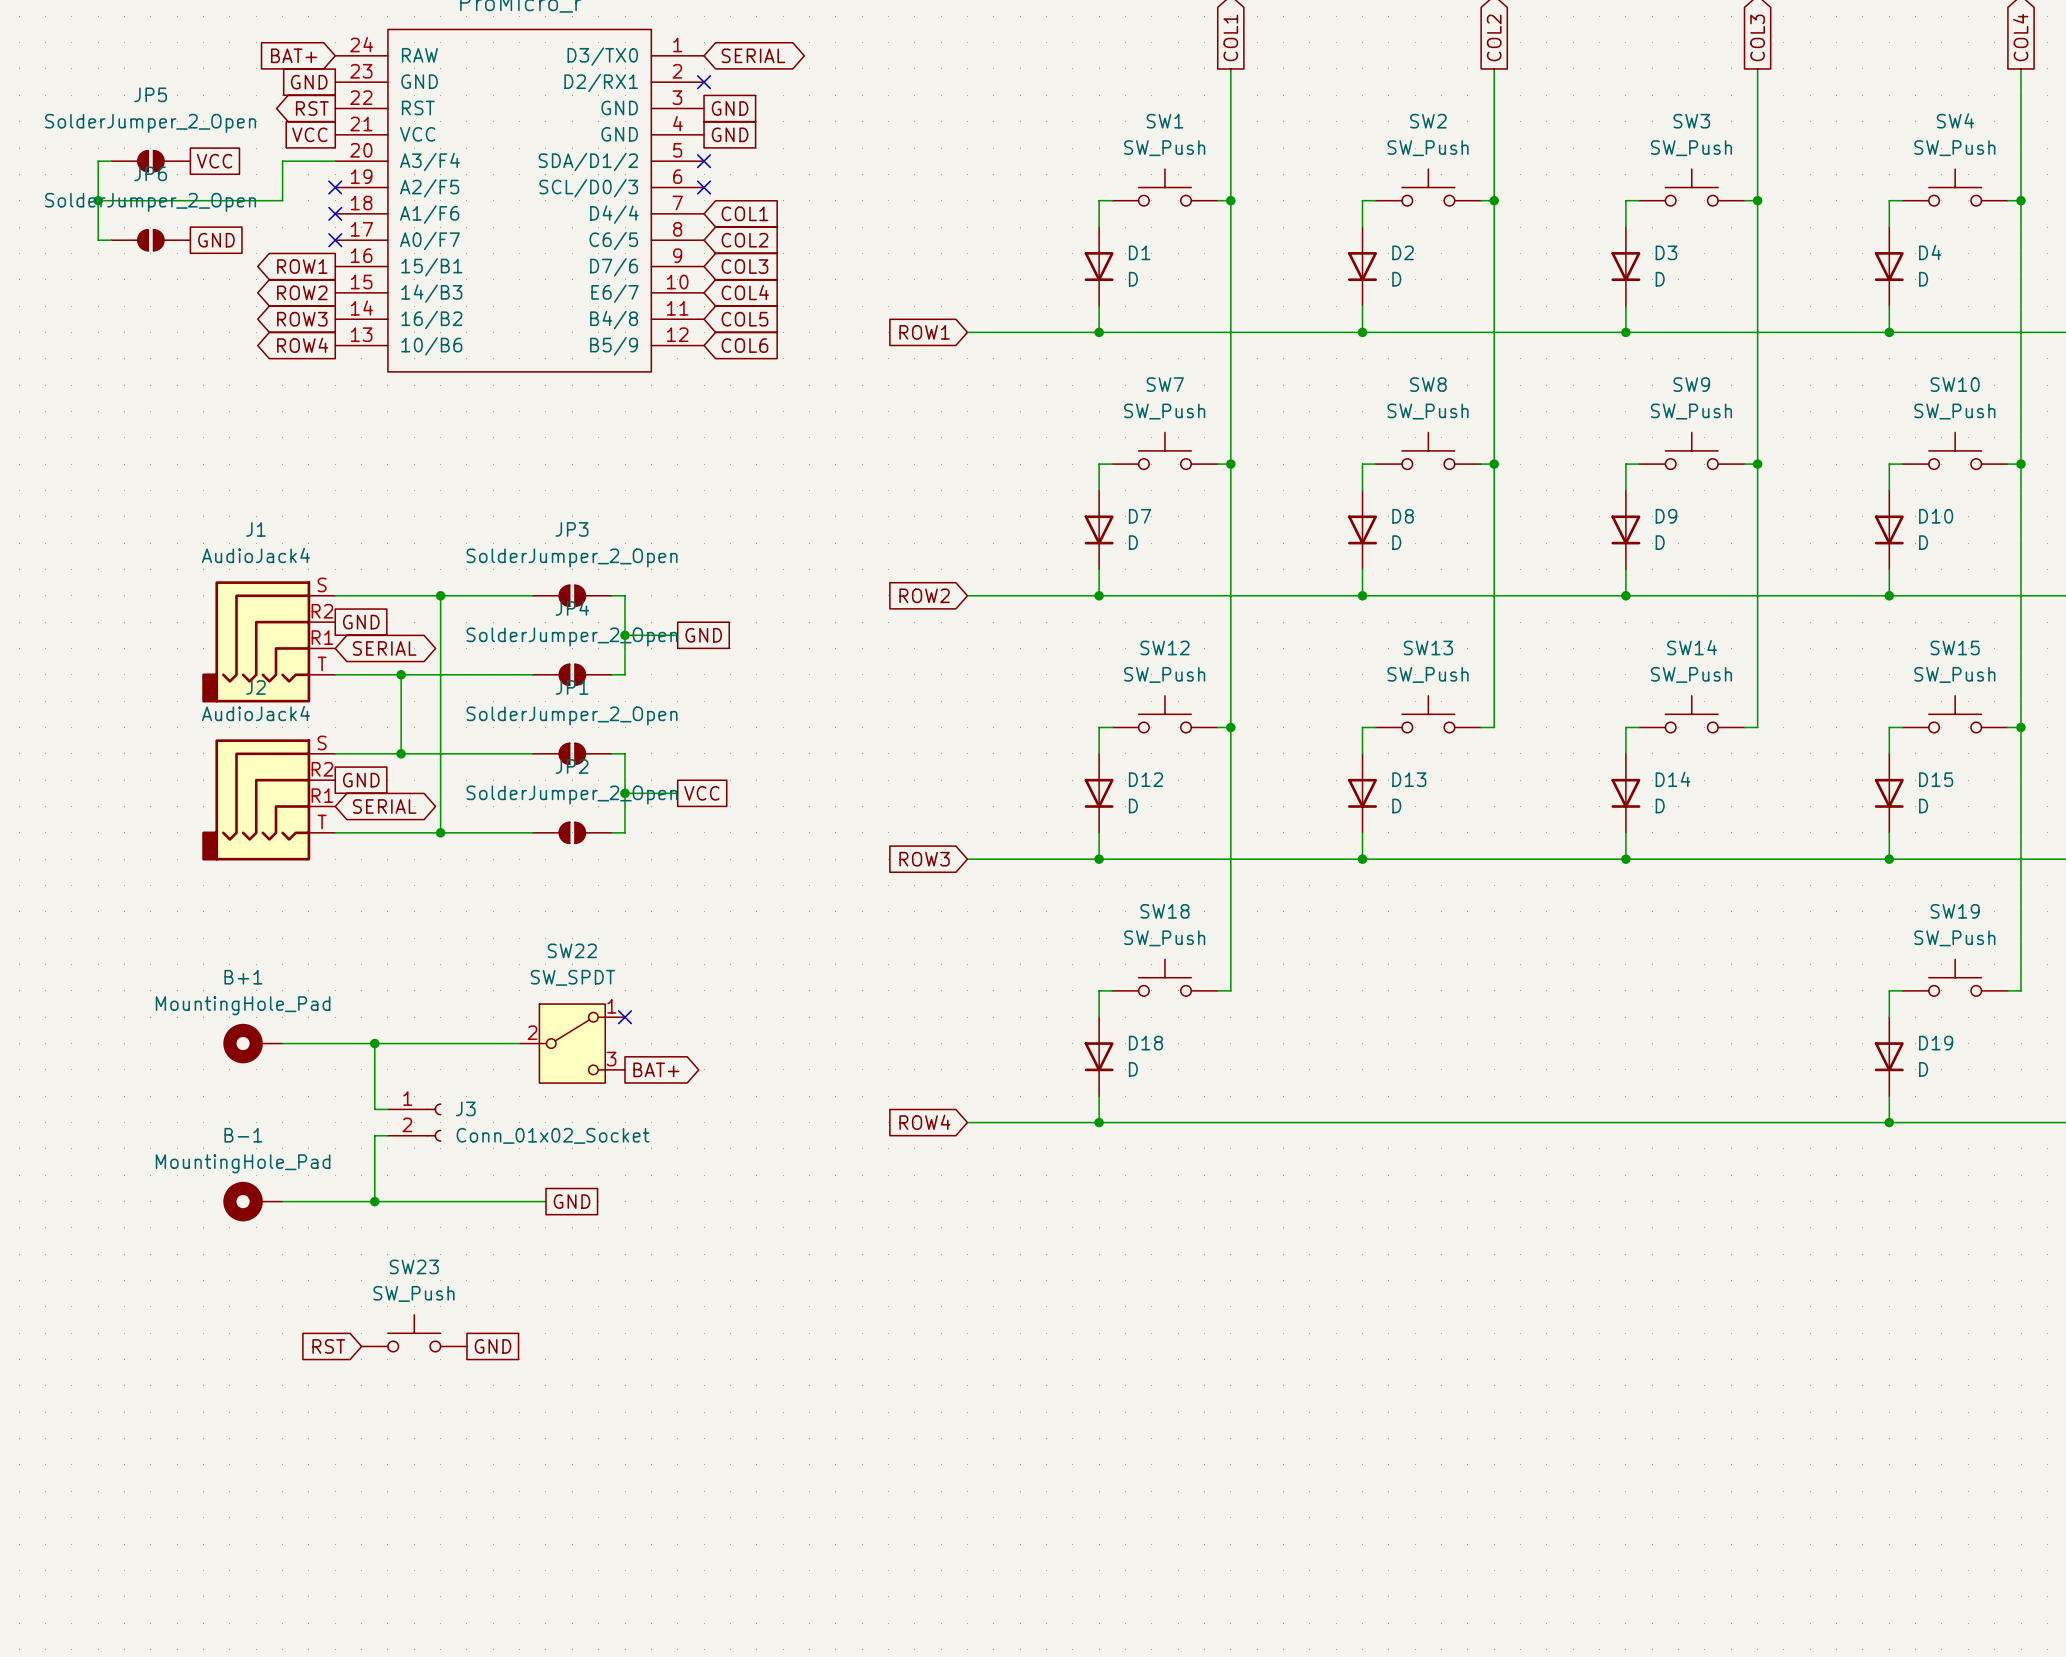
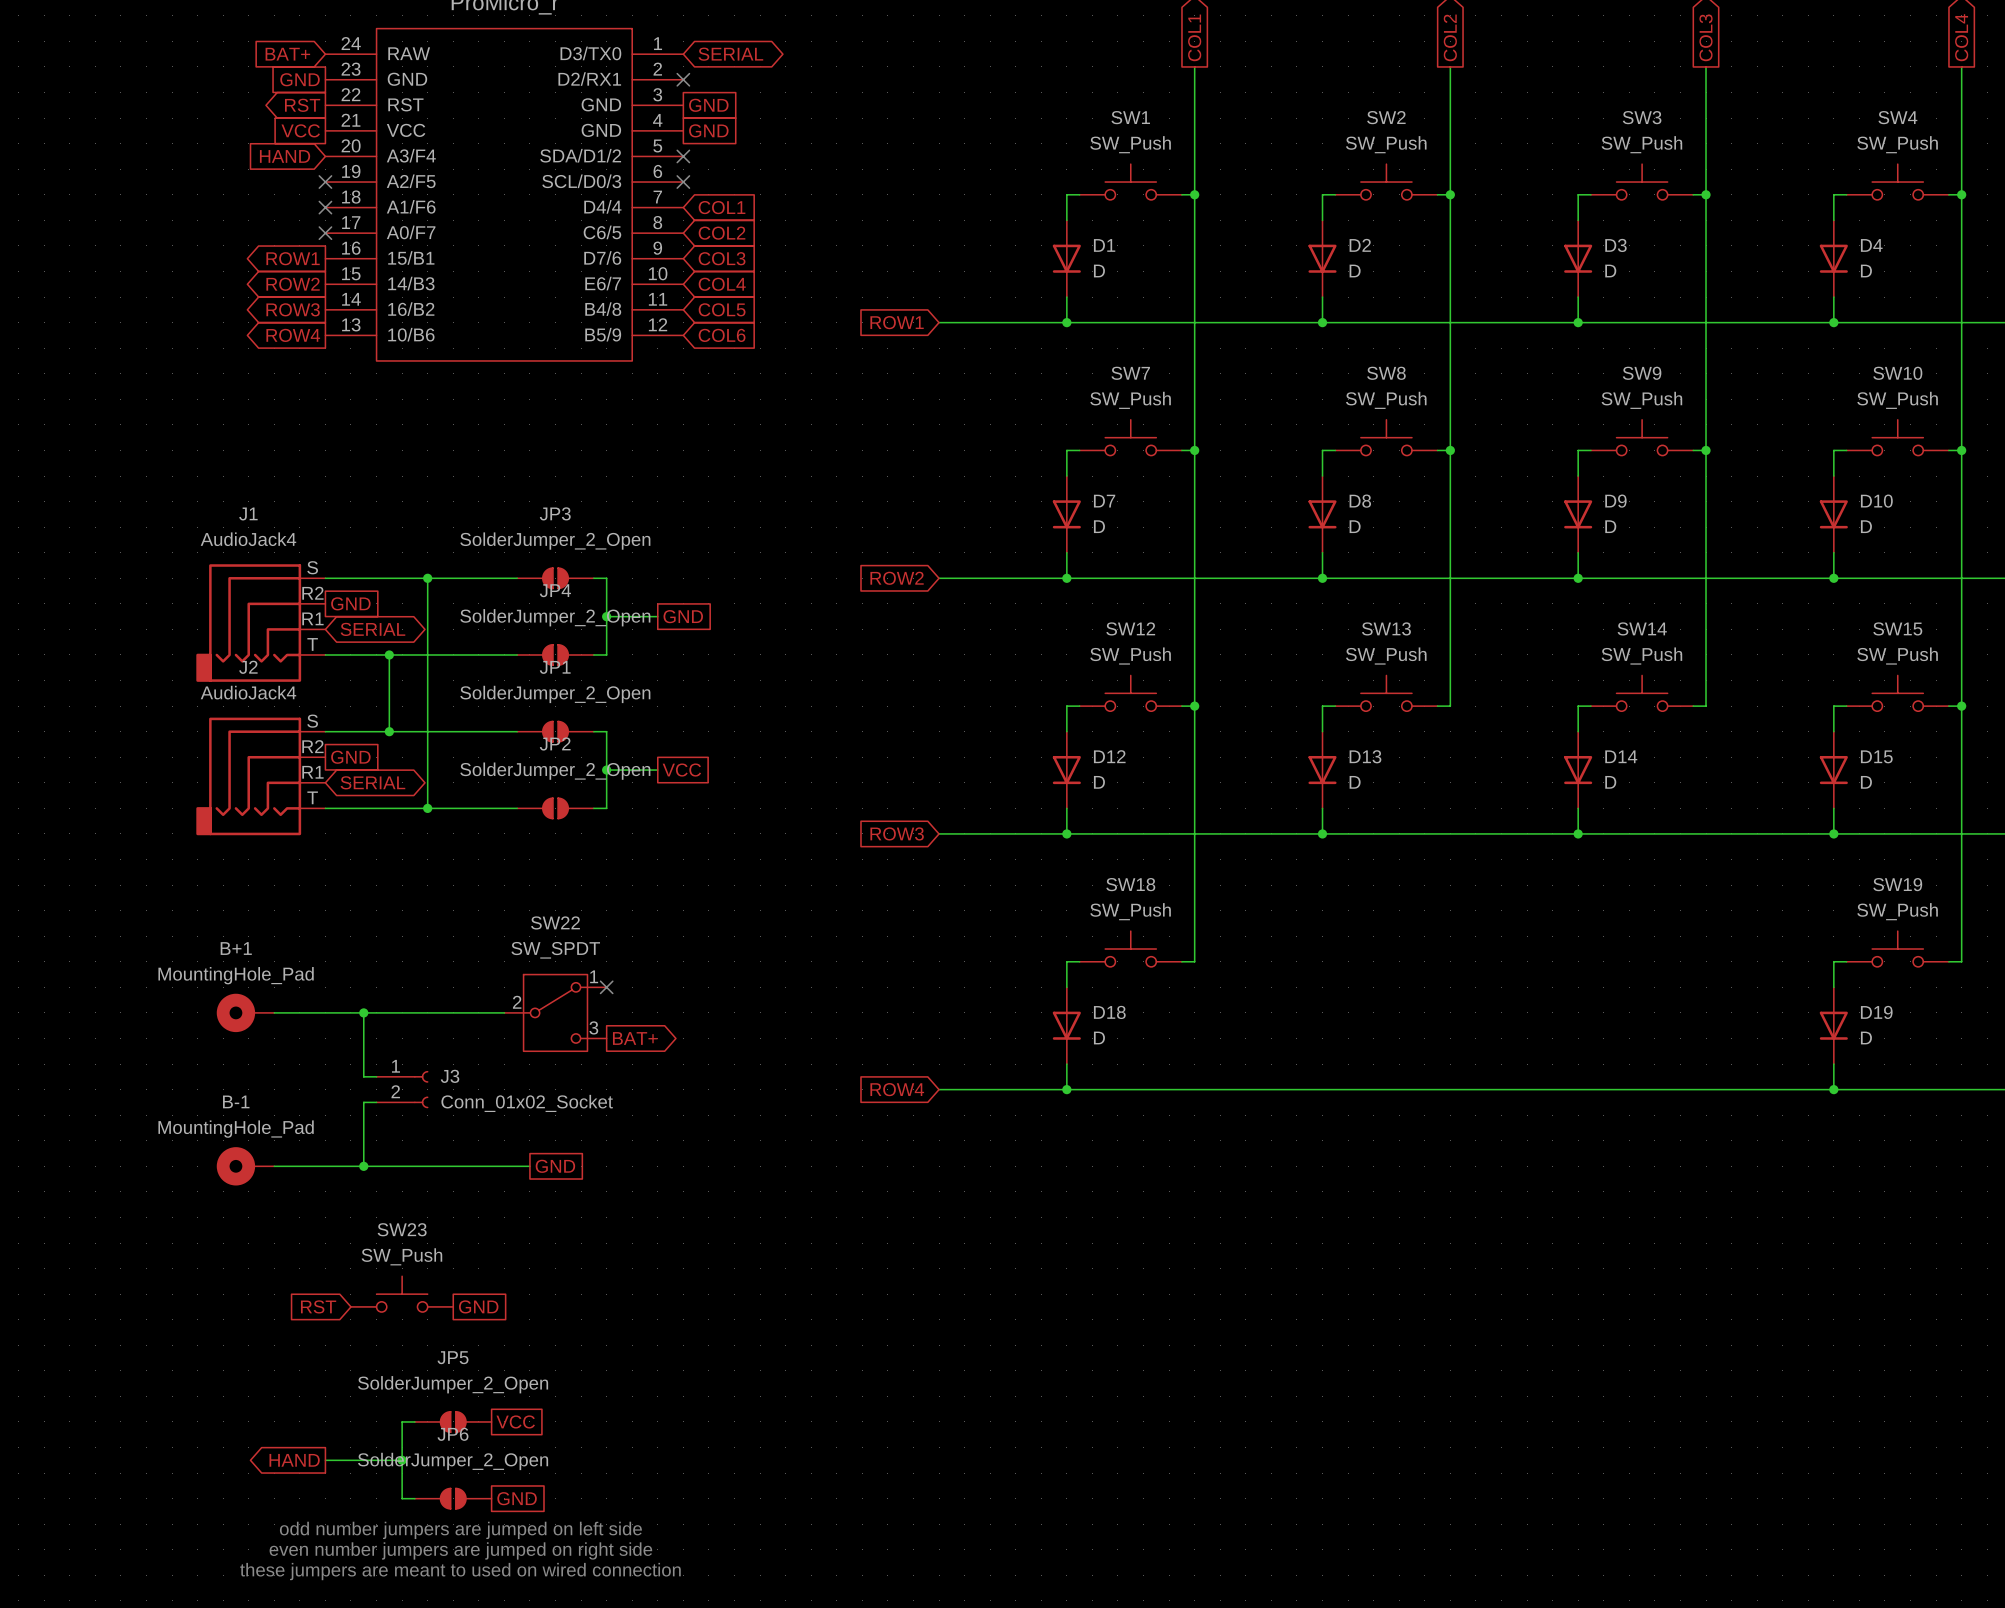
wire: (111, 161) (98, 161) (98, 240) (111, 240) -> none
JP5 position: (150, 161) -> (453, 1421)
global label: VCC (214, 161) -> none
global label: none -> HAND (285, 156)
wire: (335, 161) (282, 161) (282, 200) (98, 200) -> none
junction: (98, 200) -> none
JP6 position: (150, 240) -> (453, 1498)
global label: GND (216, 240) -> none
wire: none -> (414, 1421) (402, 1421) (402, 1498) (414, 1498)
global label: none -> VCC (515, 1421)
global label: none -> HAND (294, 1460)
wire: none -> (325, 1460) (402, 1460)
junction: none -> (402, 1460)
global label: none -> GND (517, 1498)
text: none -> odd number jumpers are jumped on left side (460, 1530)
text: none -> even number jumpers are jumped on right side (460, 1550)
text: none -> these jumpers are meant to used on wired connection (460, 1571)

